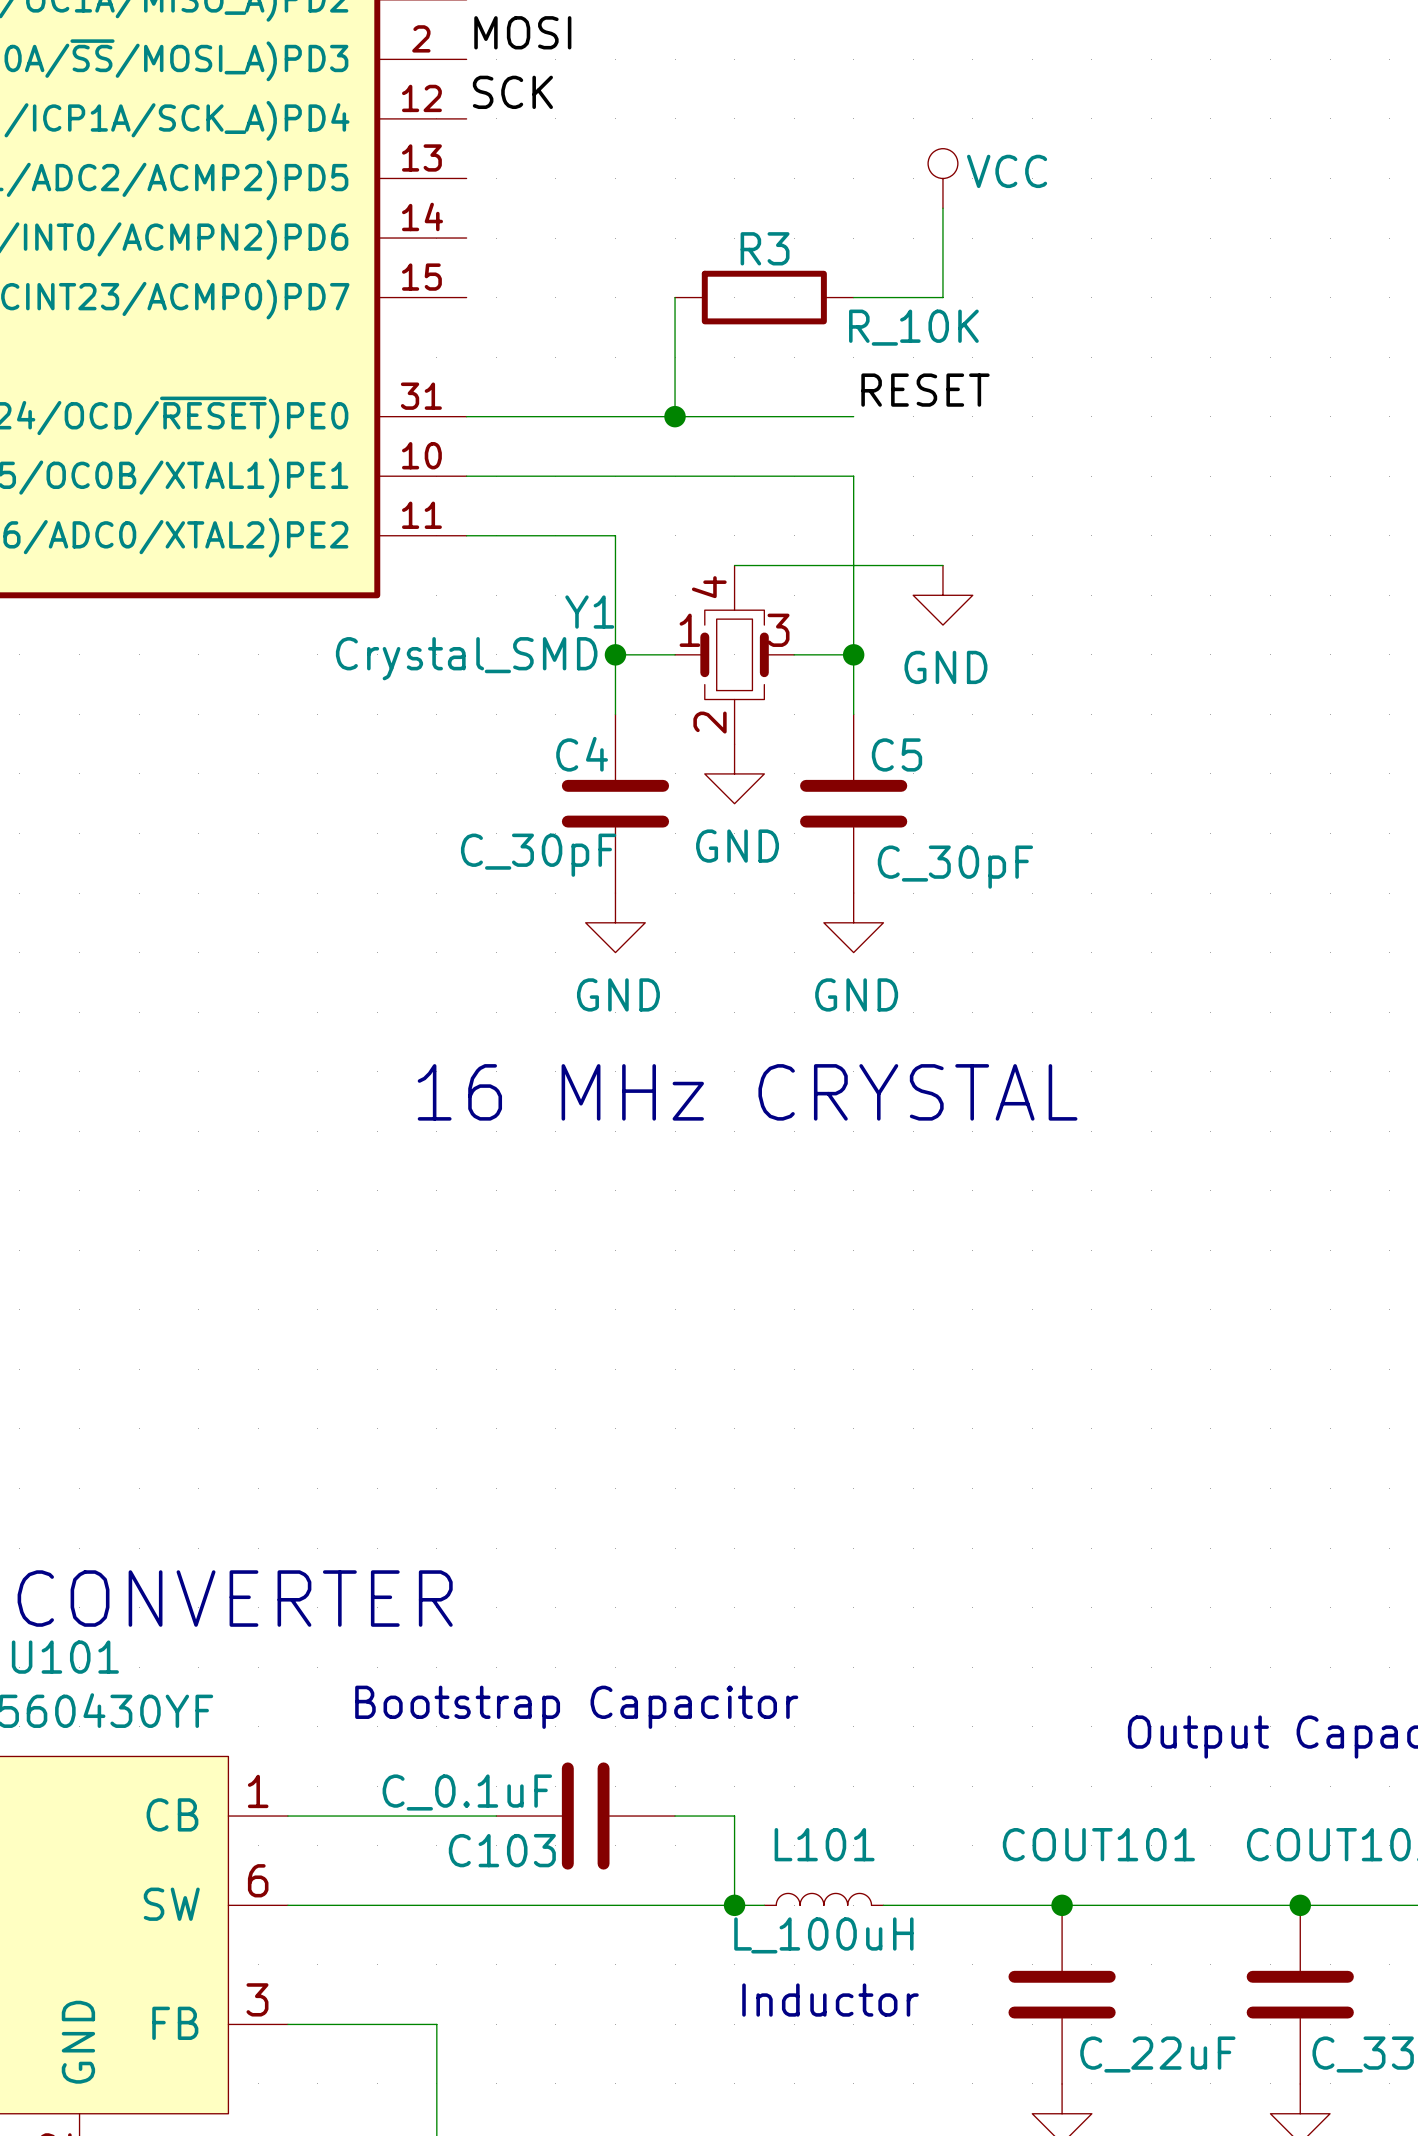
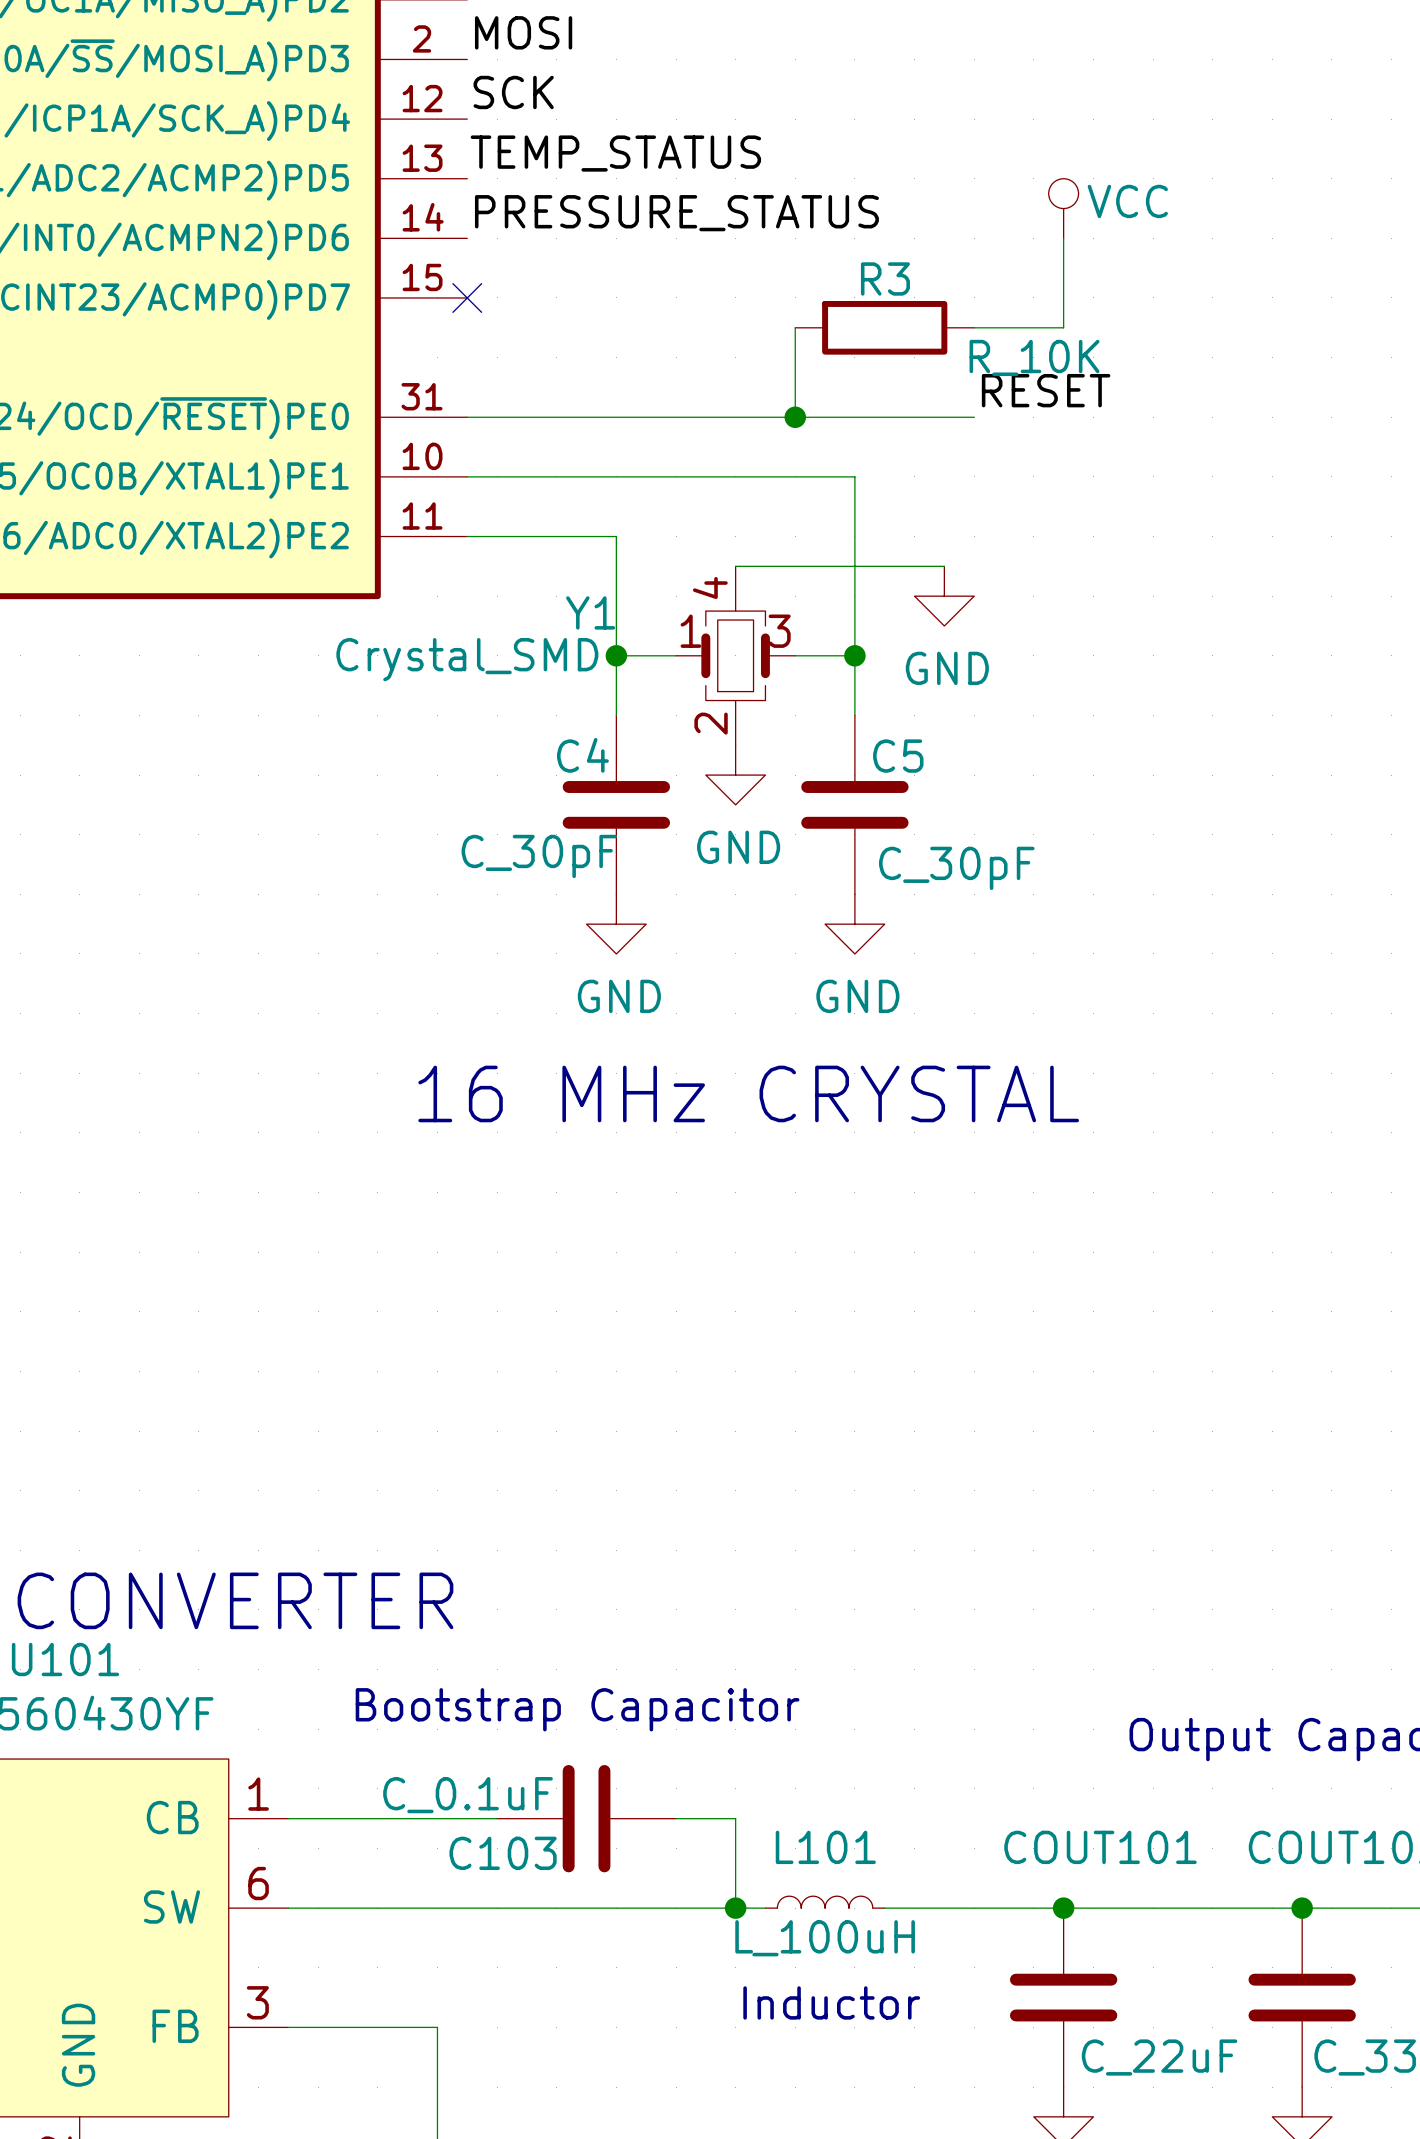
label: none -> TEMP_STATUS (615, 153)
power symbol position: VCC (942, 178) -> VCC (1063, 208)
wire: (942, 208) (942, 297) (853, 297) -> (1063, 238) (1063, 327) (974, 327)
label: none -> PRESSURE_STATUS (676, 213)
no-connect mark: none -> (467, 297)
wire: (675, 297) (675, 416) -> none
R3 position: (764, 297) -> (884, 327)
wire: none -> (795, 327) (795, 417)
label position: RESET (925, 390) -> RESET (1046, 390)
junction position: (675, 416) -> (795, 417)
wire: none -> (854, 417) (974, 417)

